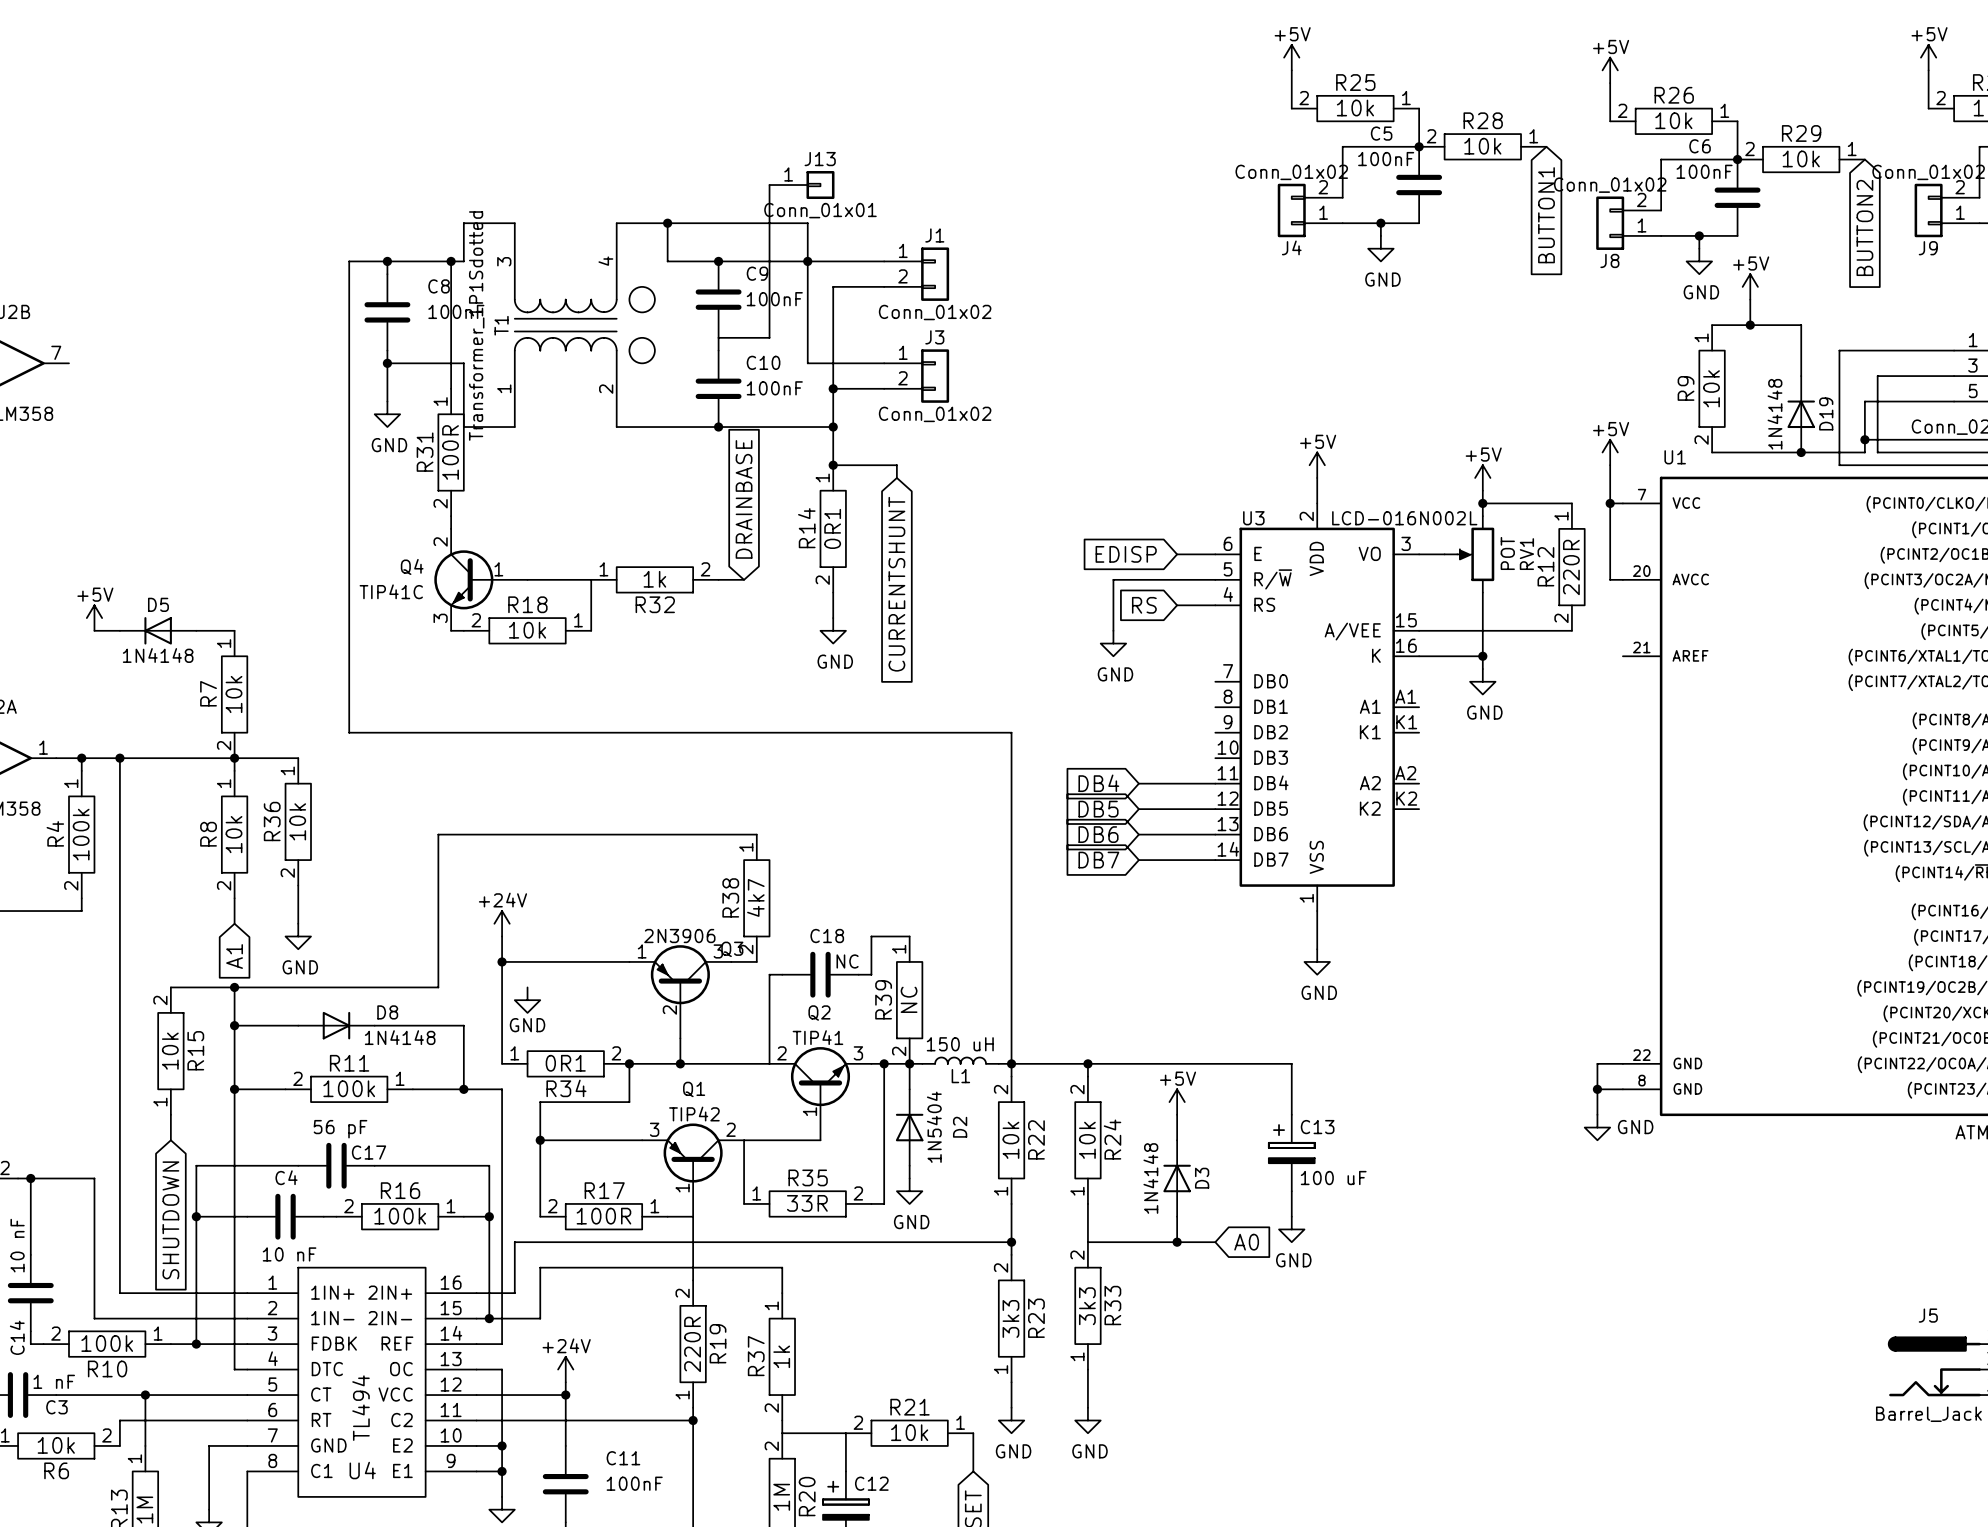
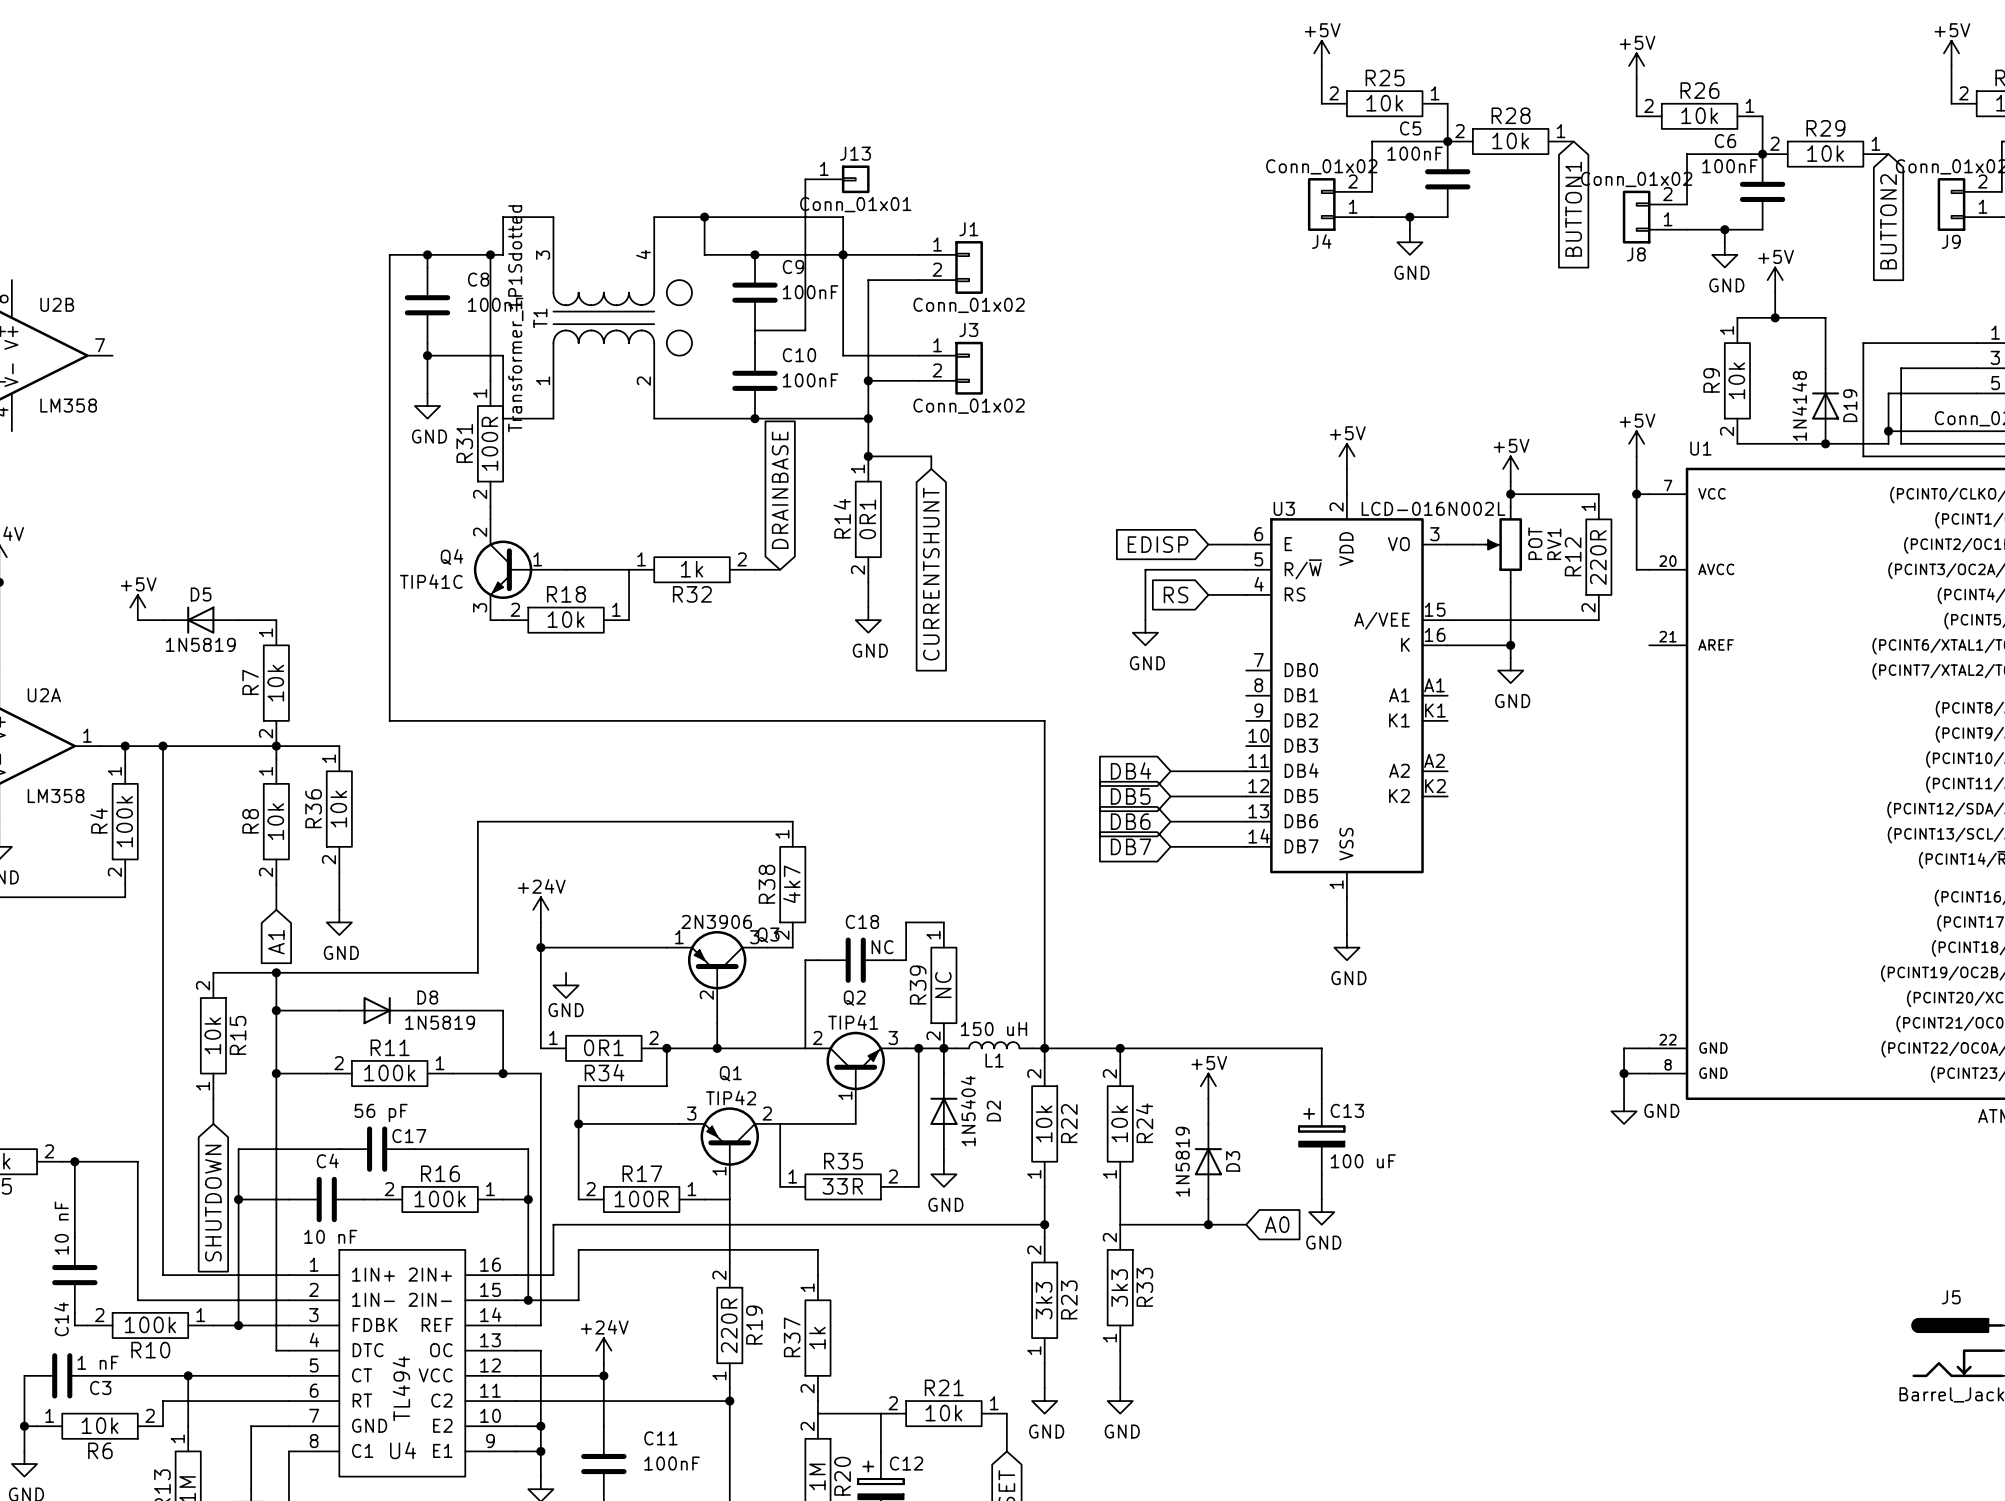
D5 value: 1N4148 (158, 655) -> 1N5819 (200, 644)
D8 value: 1N4148 (400, 1037) -> 1N5819 (440, 1022)
D3 value: 1N4148 (1150, 1178) -> 1N5819 (1182, 1161)

